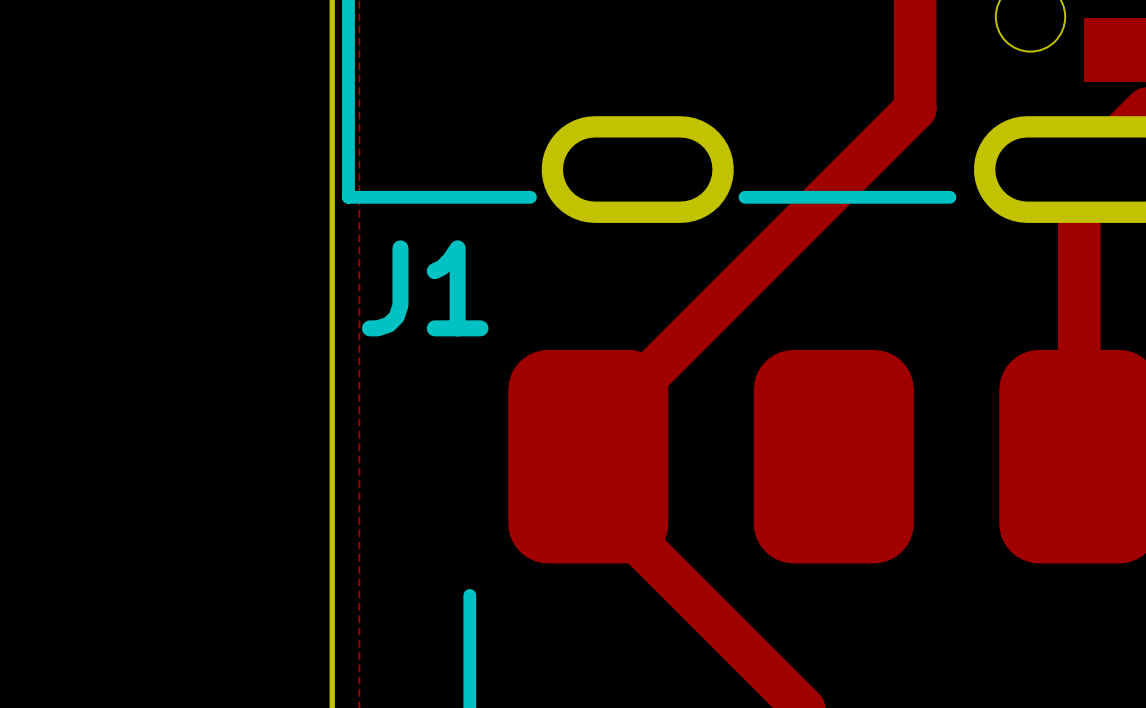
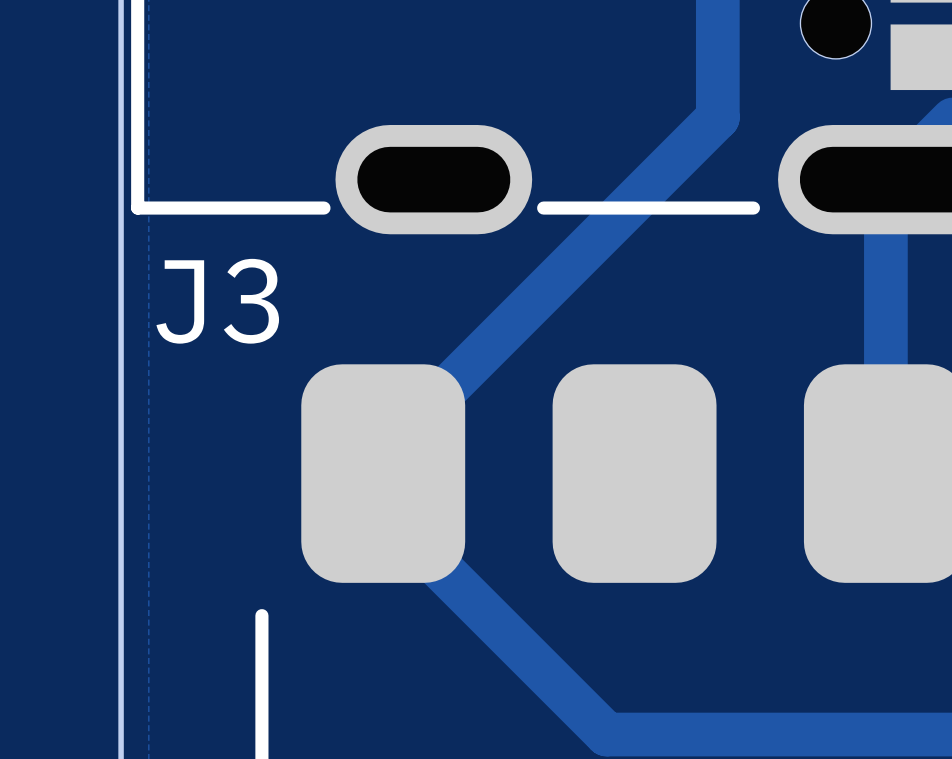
J1 name: J1 (425, 288) -> J3 (217, 301)

